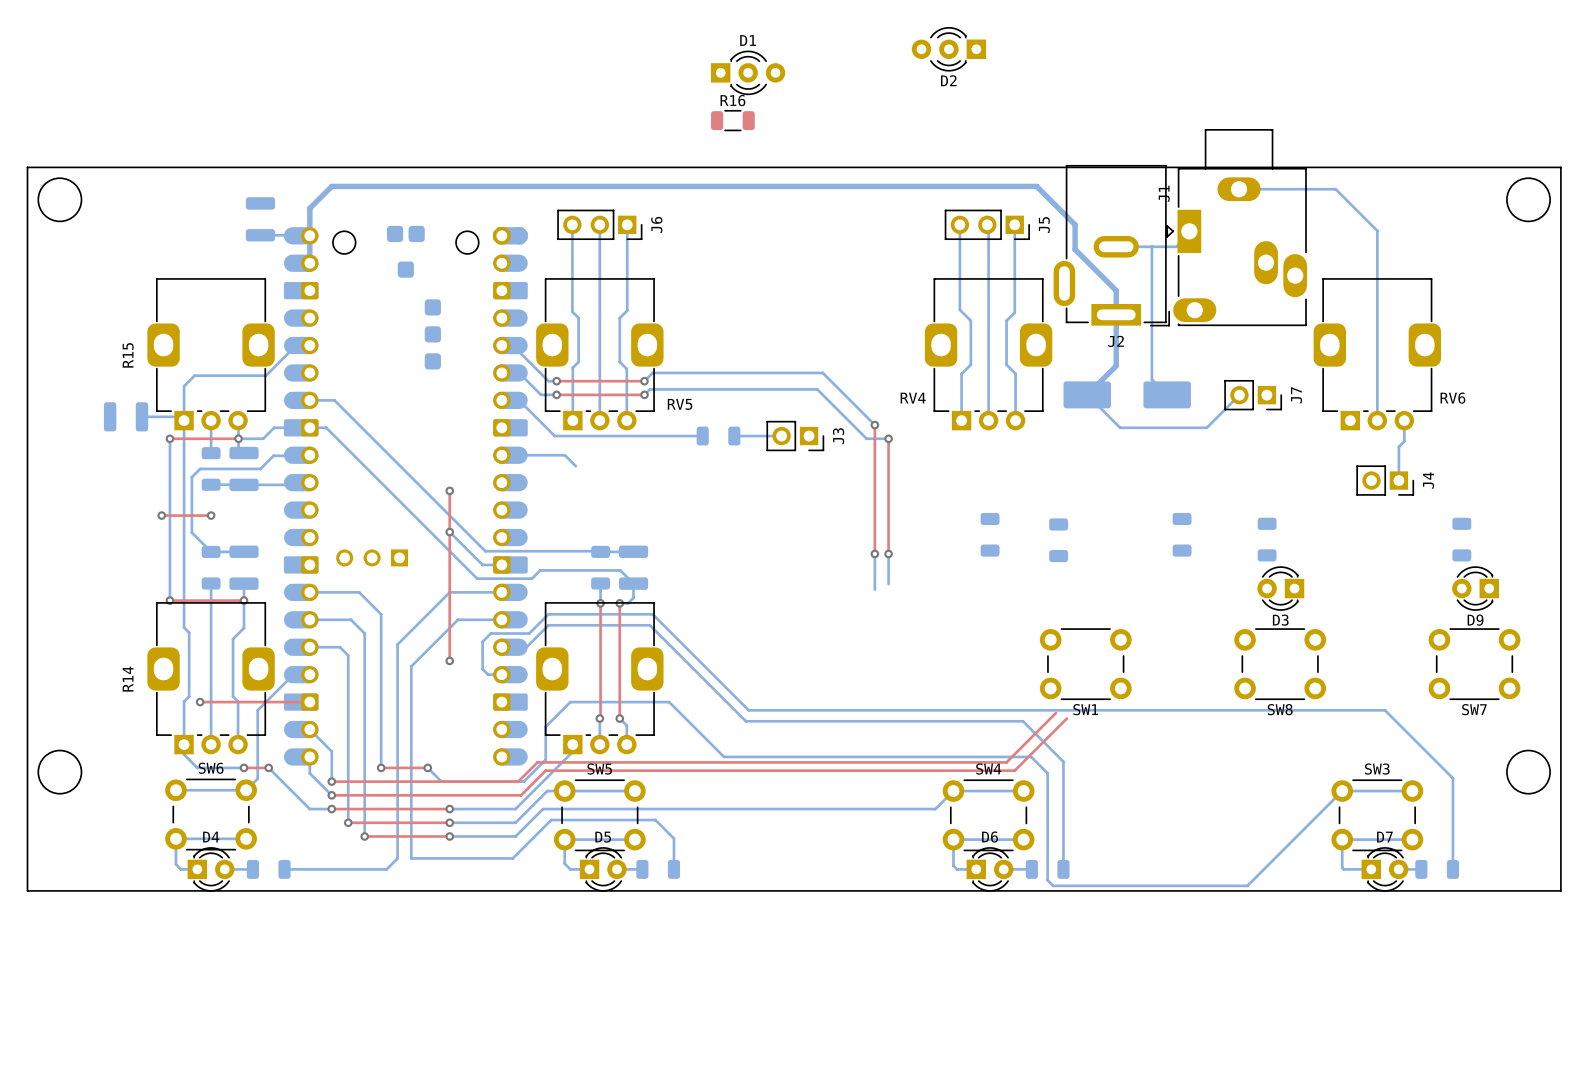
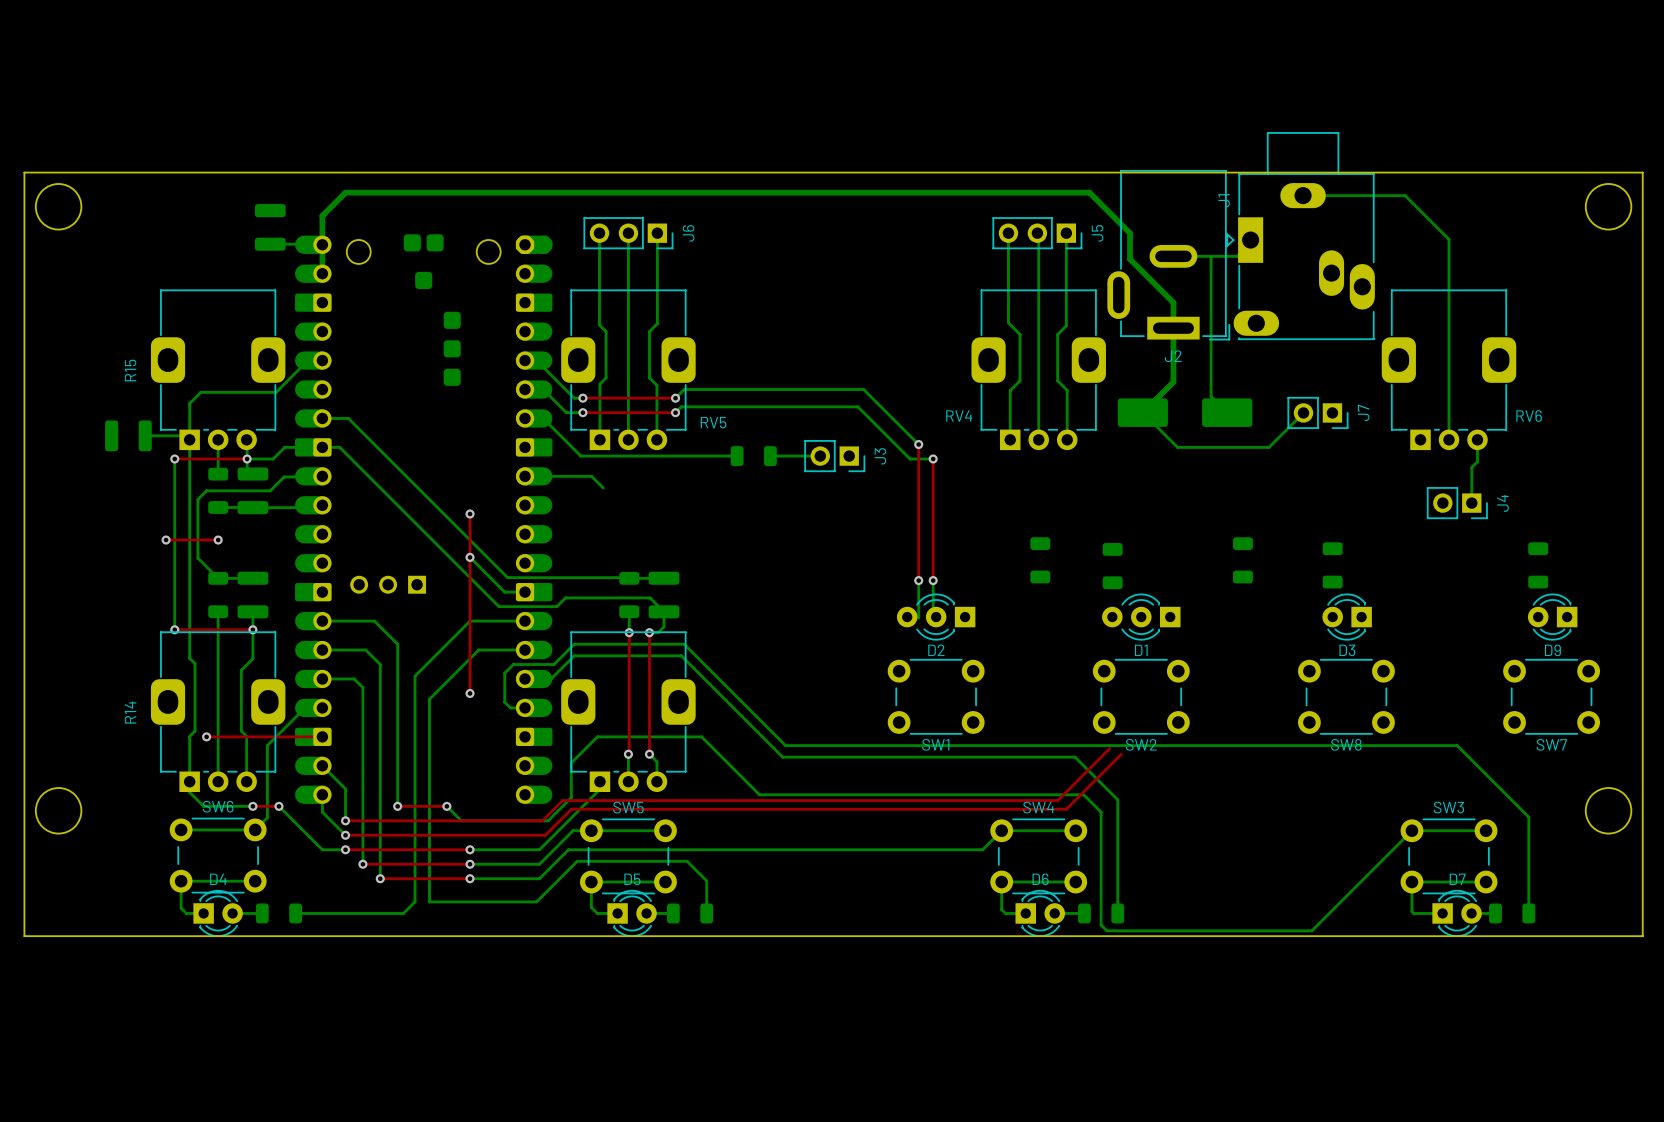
D2 position: (948, 49) -> (936, 617)
D1 rotation: 0° (748, 72) -> 180° (1141, 617)
D1 position: (748, 72) -> (1141, 617)
R16: (732, 120) -> none
SW1: none -> (936, 696)
SW1 name: SW1 (1085, 709) -> SW2 (1141, 744)

